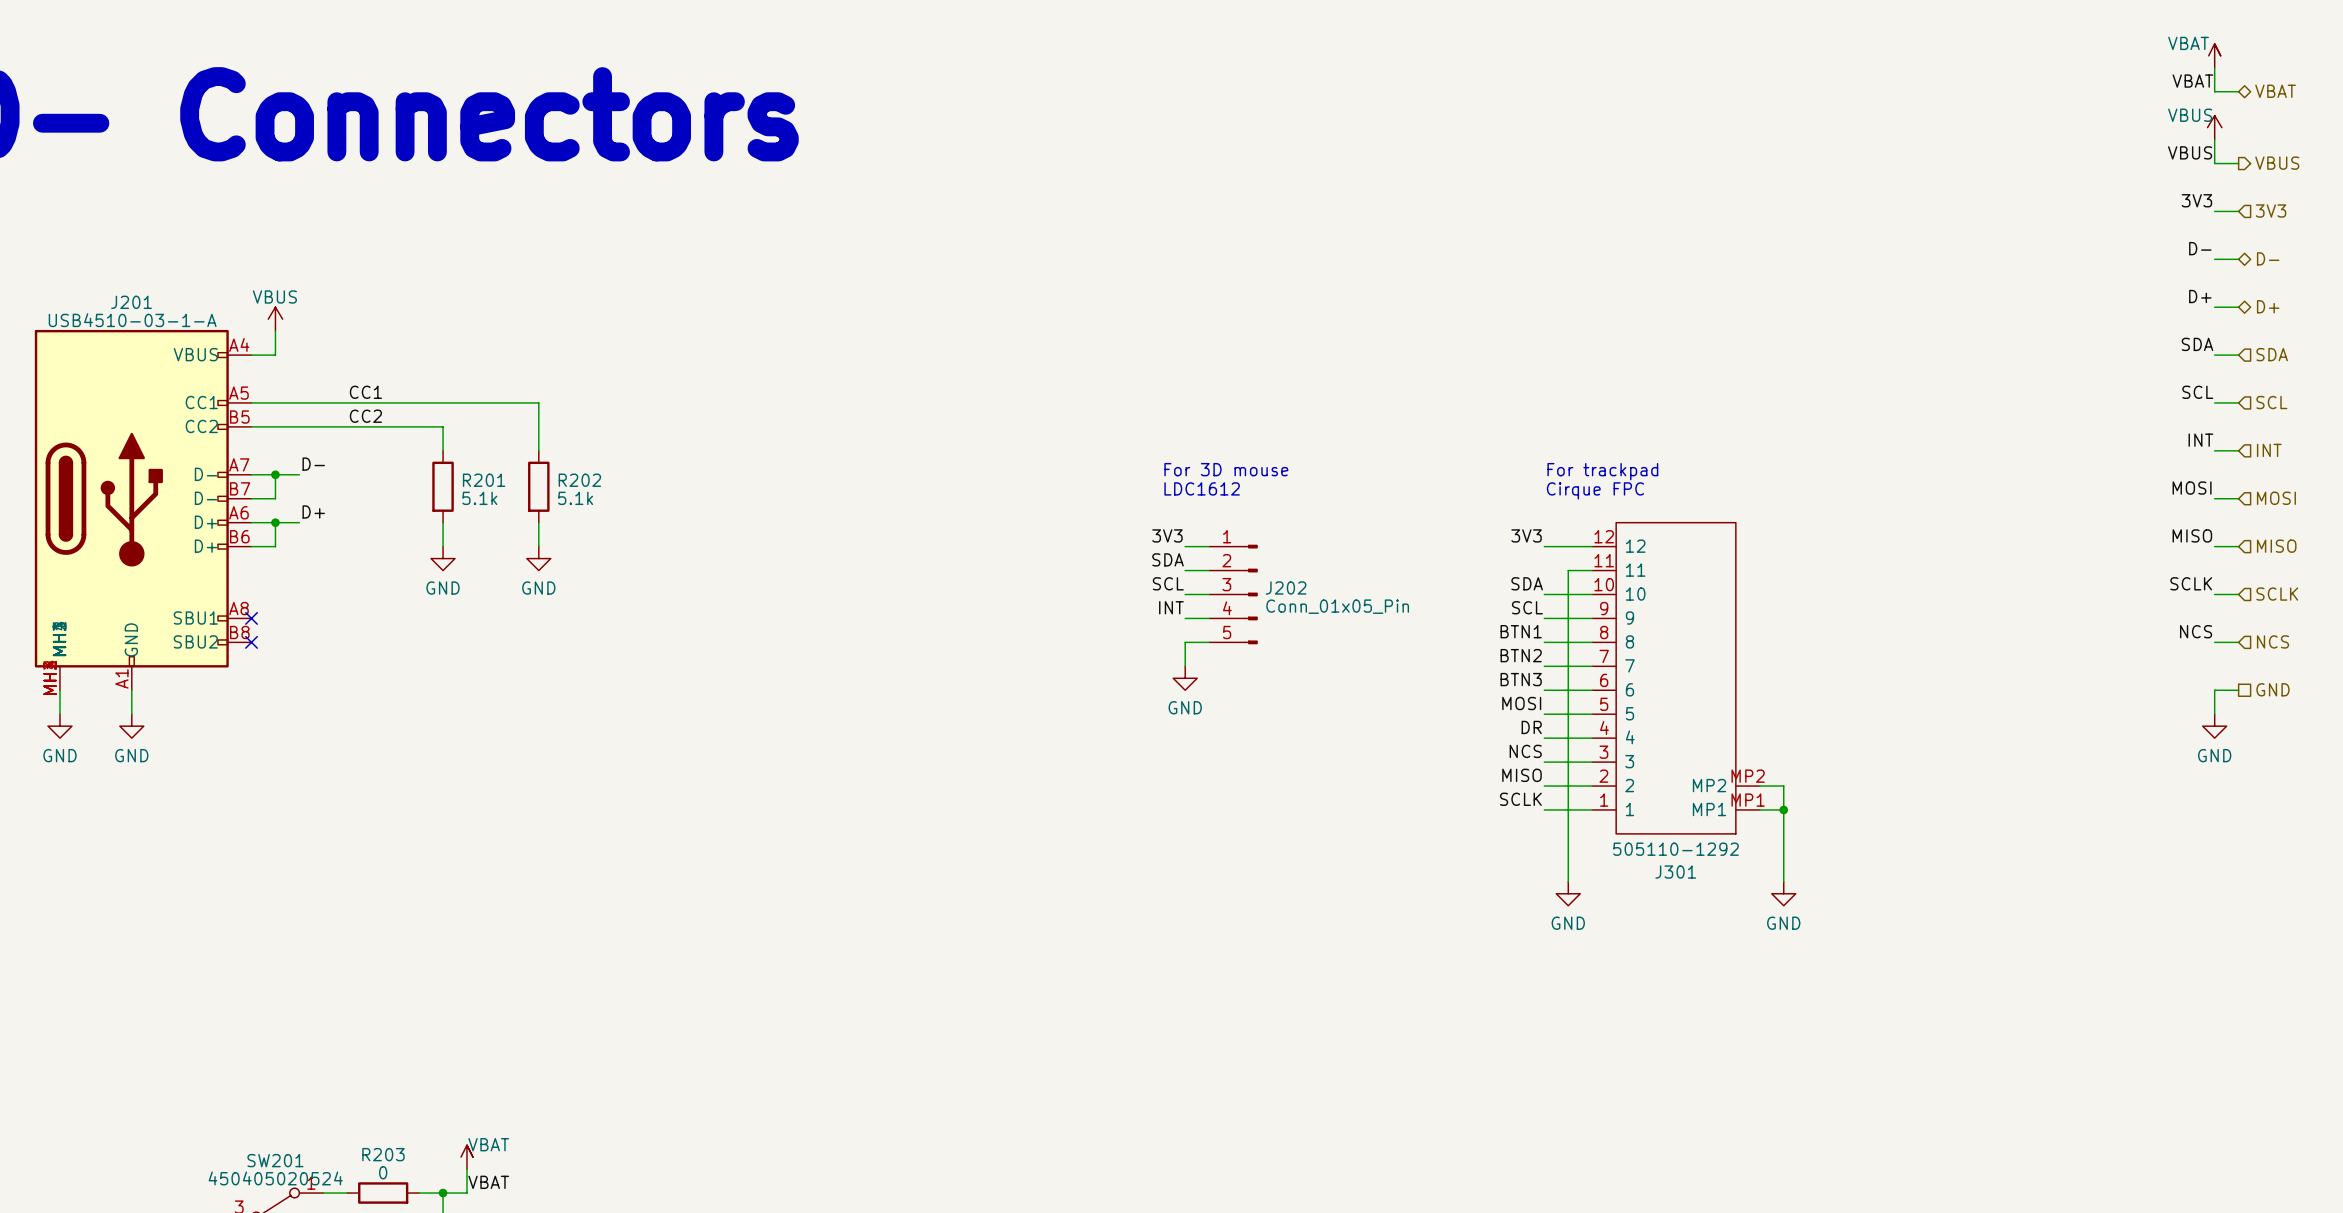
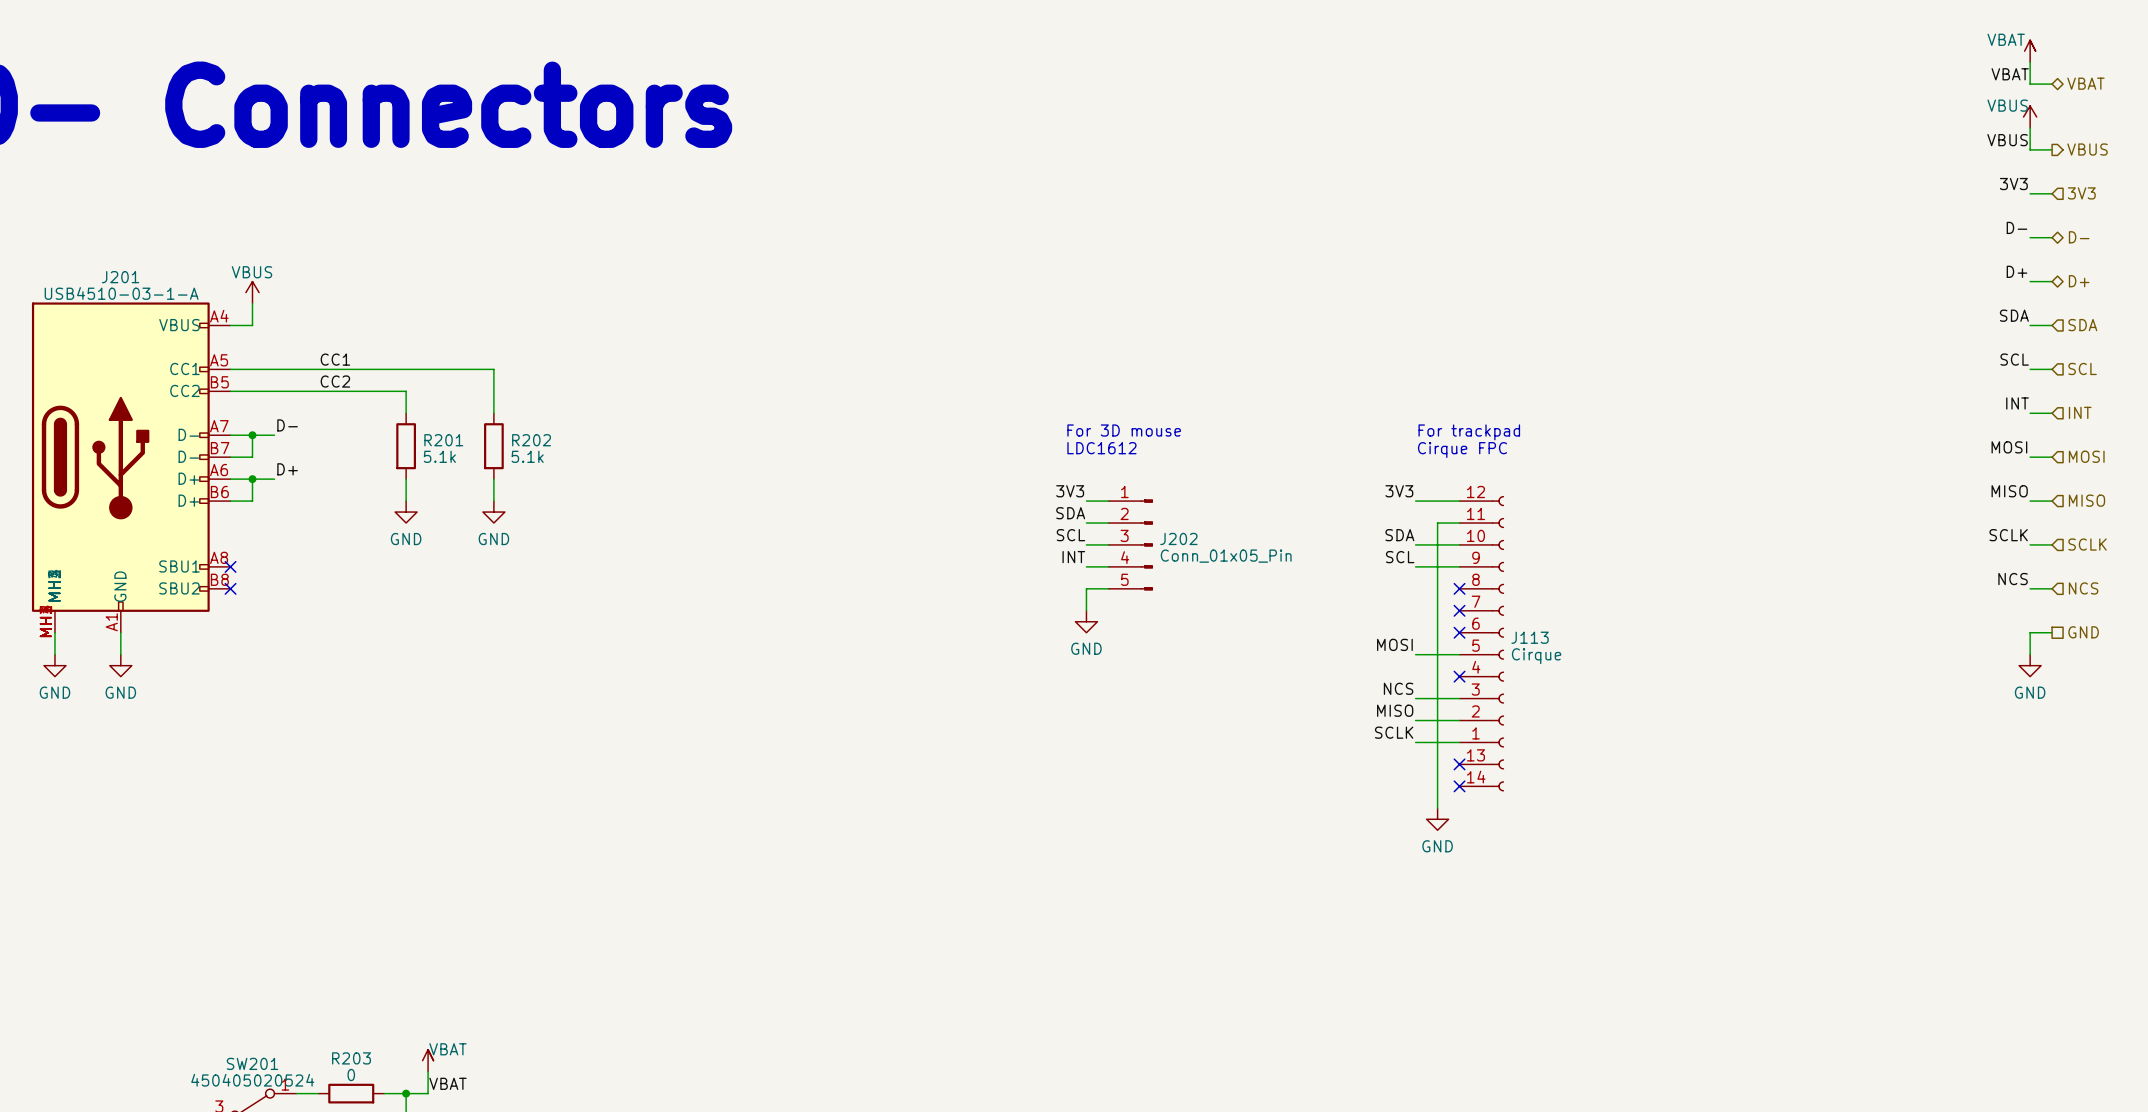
label: BTN1 (1521, 631) -> none
wire: (1544, 642) (1592, 642) -> none
no-connect mark: none -> (1459, 588)
label: BTN2 (1521, 655) -> none
wire: (1544, 666) (1592, 666) -> none
no-connect mark: none -> (1459, 610)
J301: 505110-1292 (1676, 678) -> none
label: BTN3 (1521, 679) -> none
wire: (1544, 690) (1592, 690) -> none
no-connect mark: none -> (1459, 632)
J113: none -> Cirque (1481, 643)
label: DR (1531, 727) -> none
wire: (1544, 738) (1592, 738) -> none
no-connect mark: none -> (1459, 676)
wire: (1759, 786) (1783, 786) (1783, 881) -> none
wire: (1759, 809) (1783, 809) -> none
junction: (1783, 809) -> none
no-connect mark: none -> (1459, 764)
no-connect mark: none -> (1459, 786)
power symbol: GND (1783, 893) -> none

